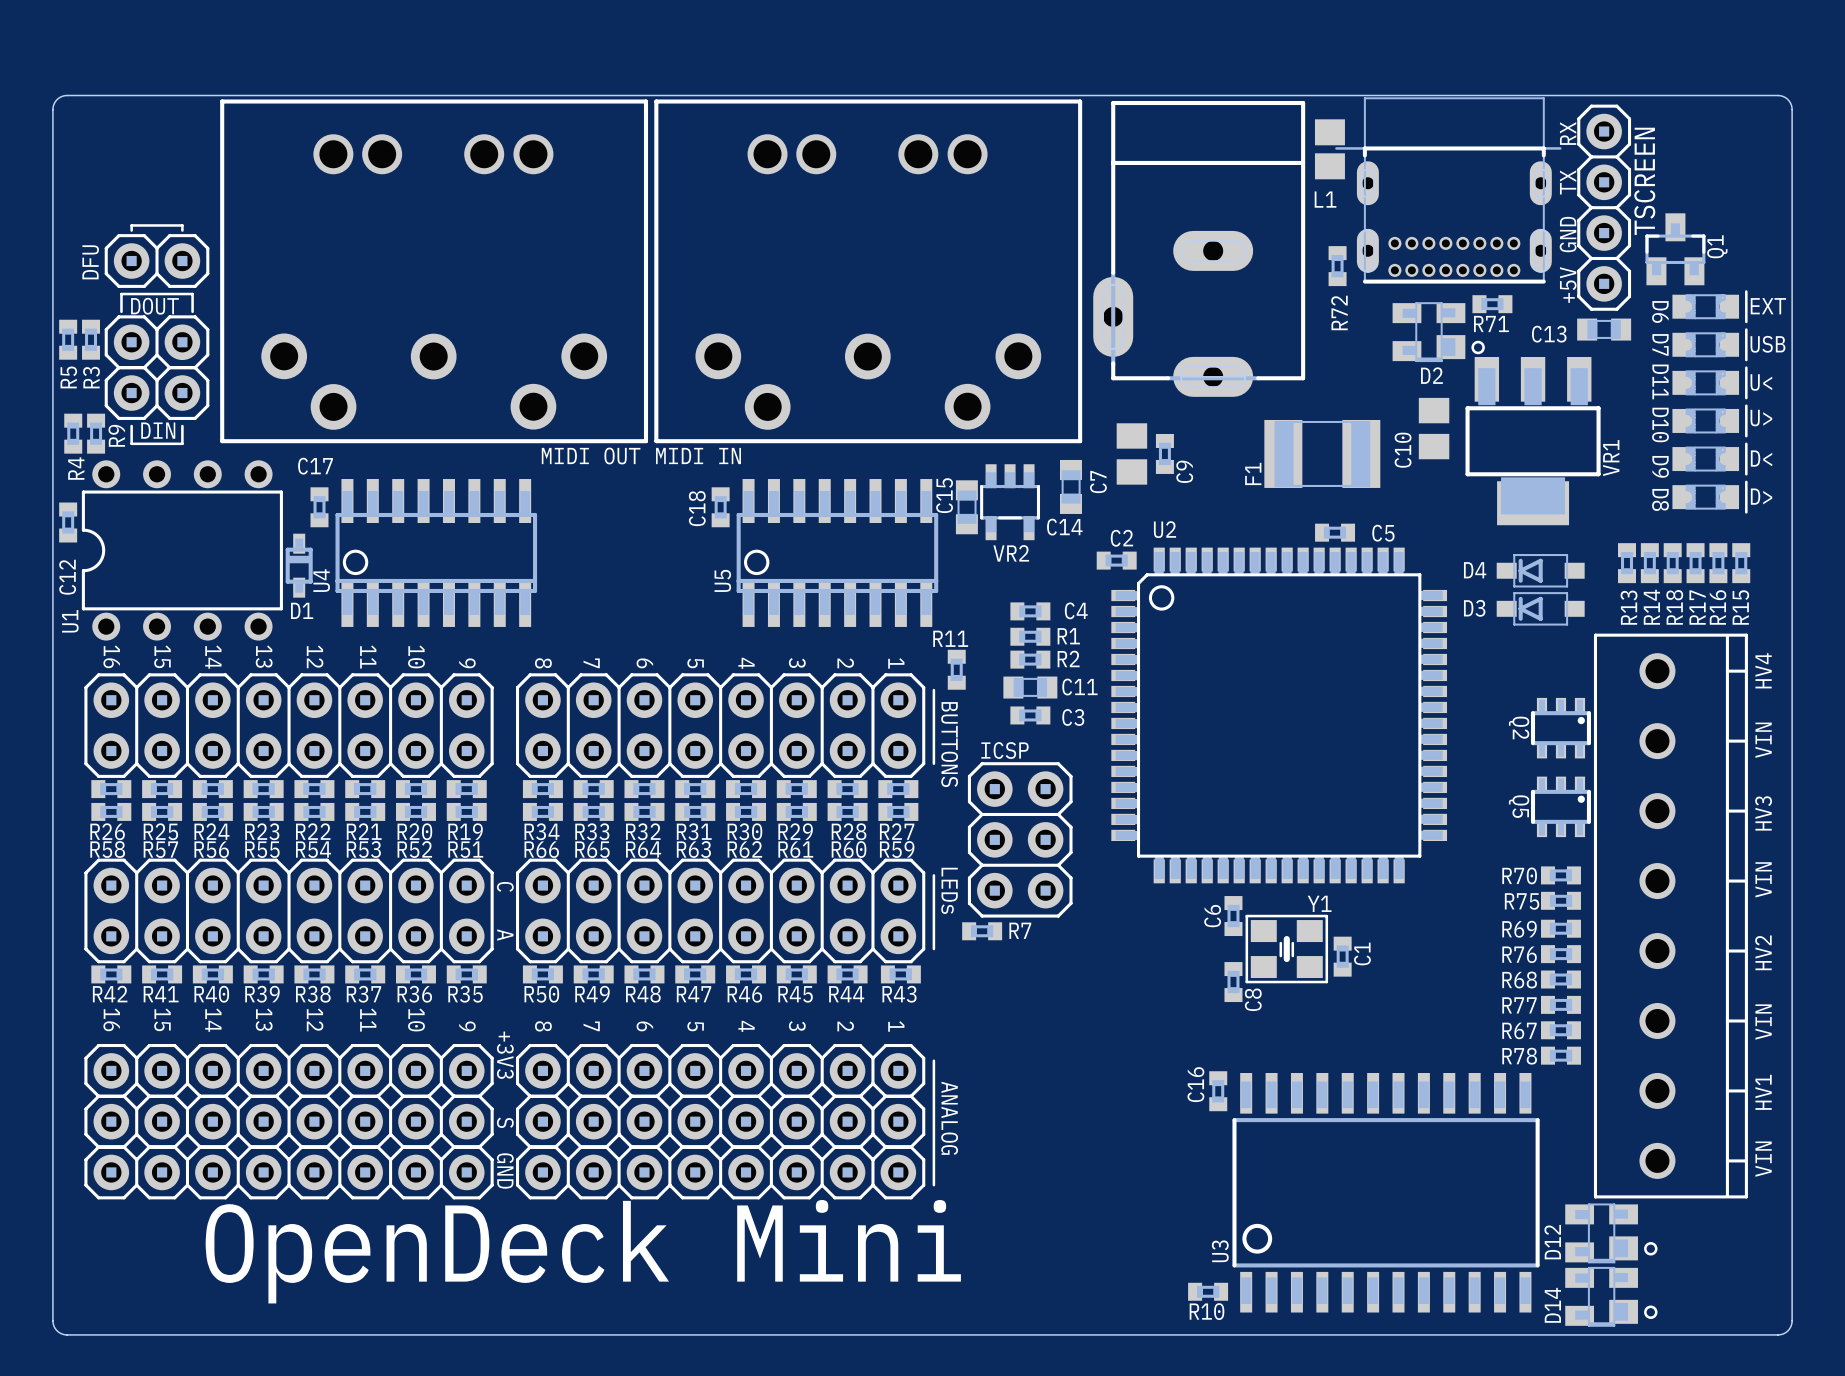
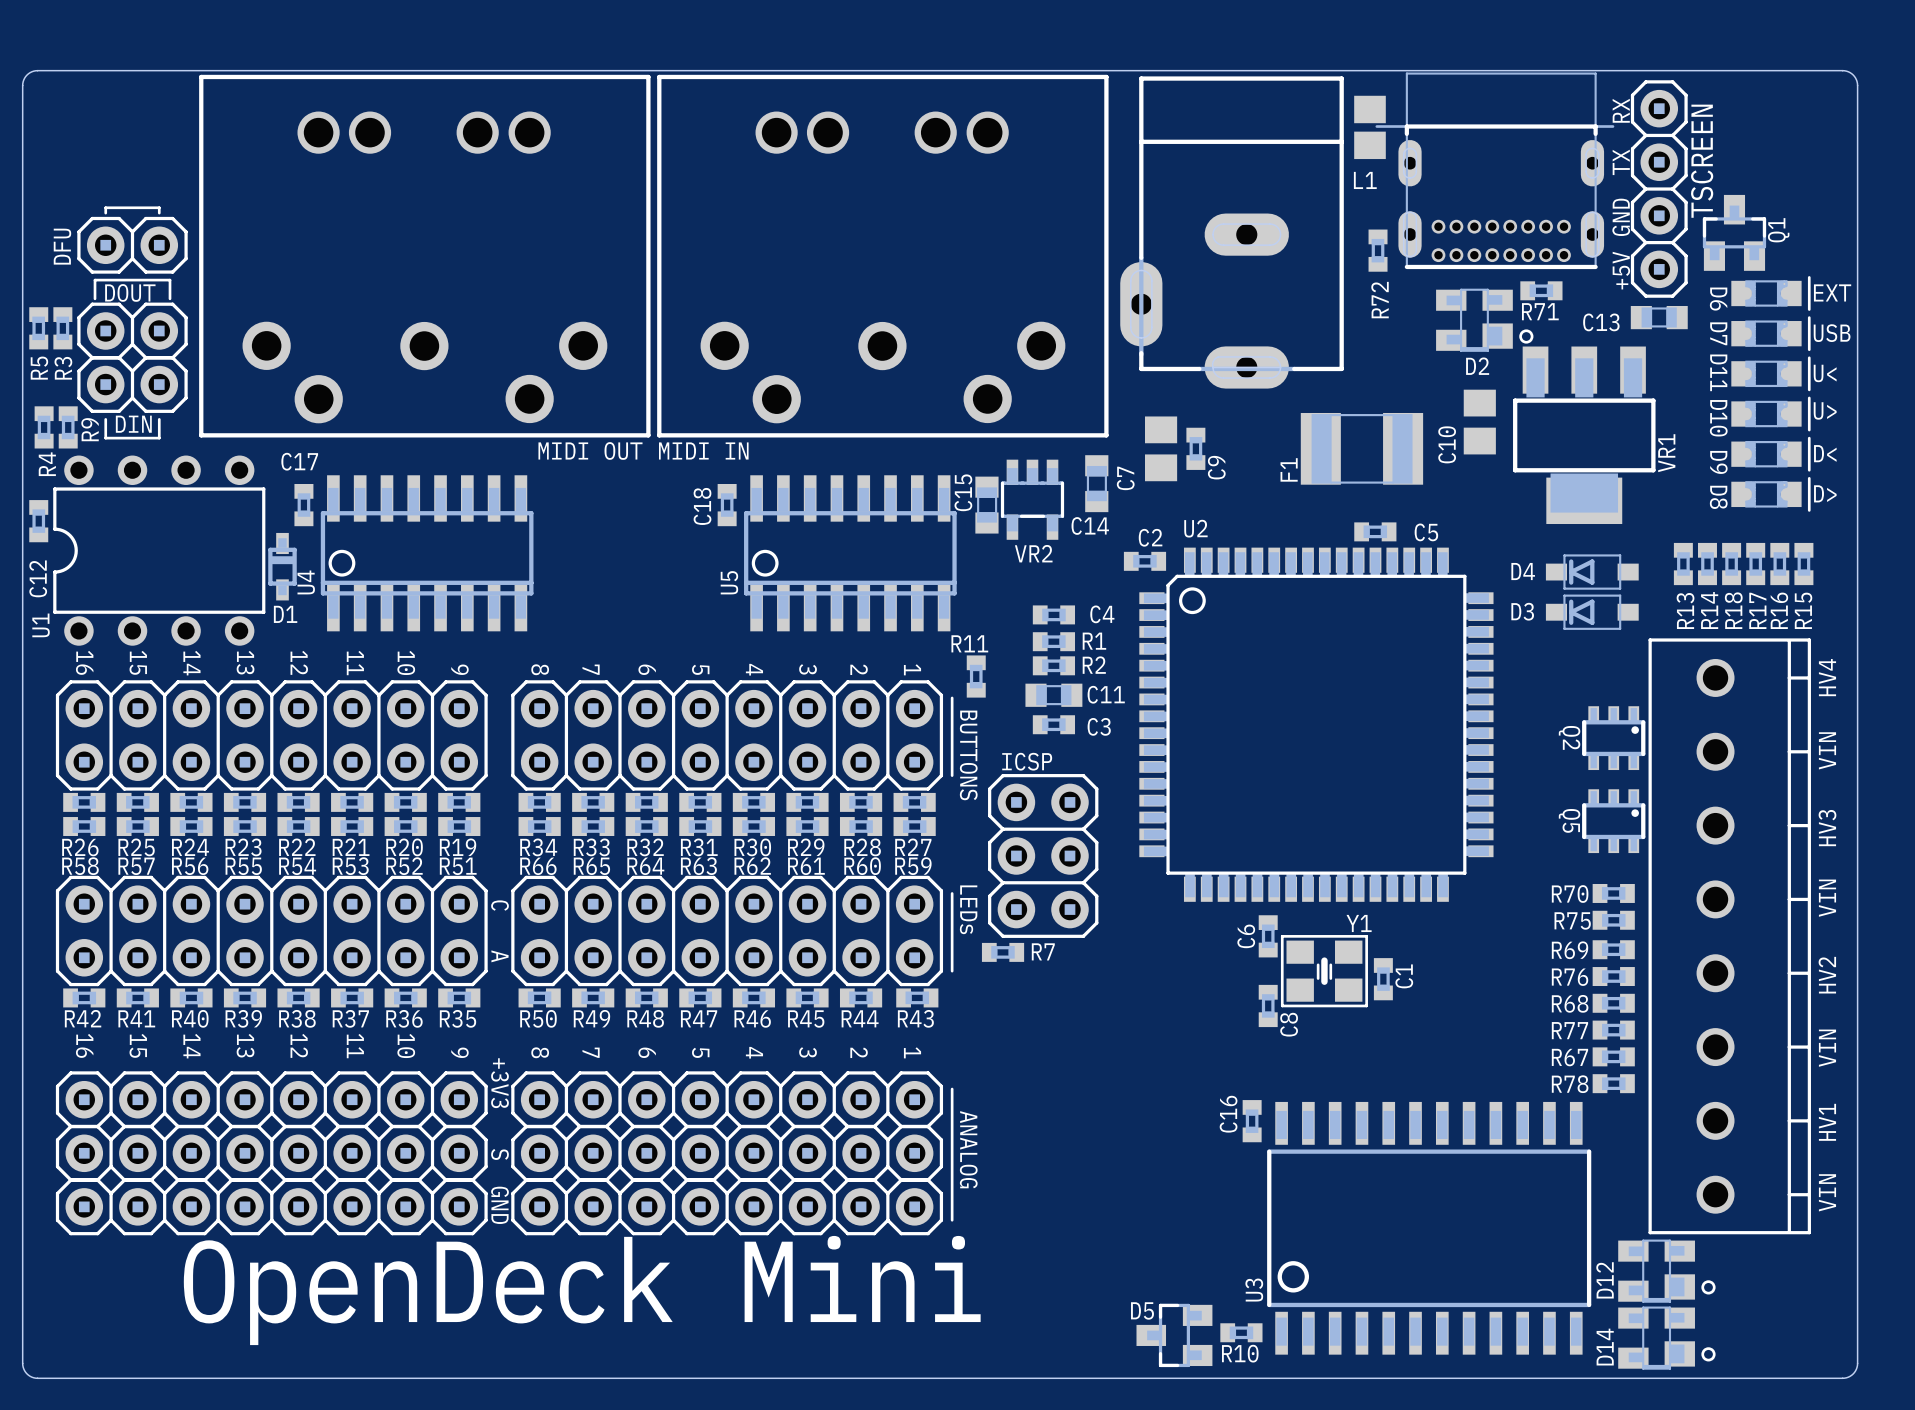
D5: none -> (1174, 1335)

